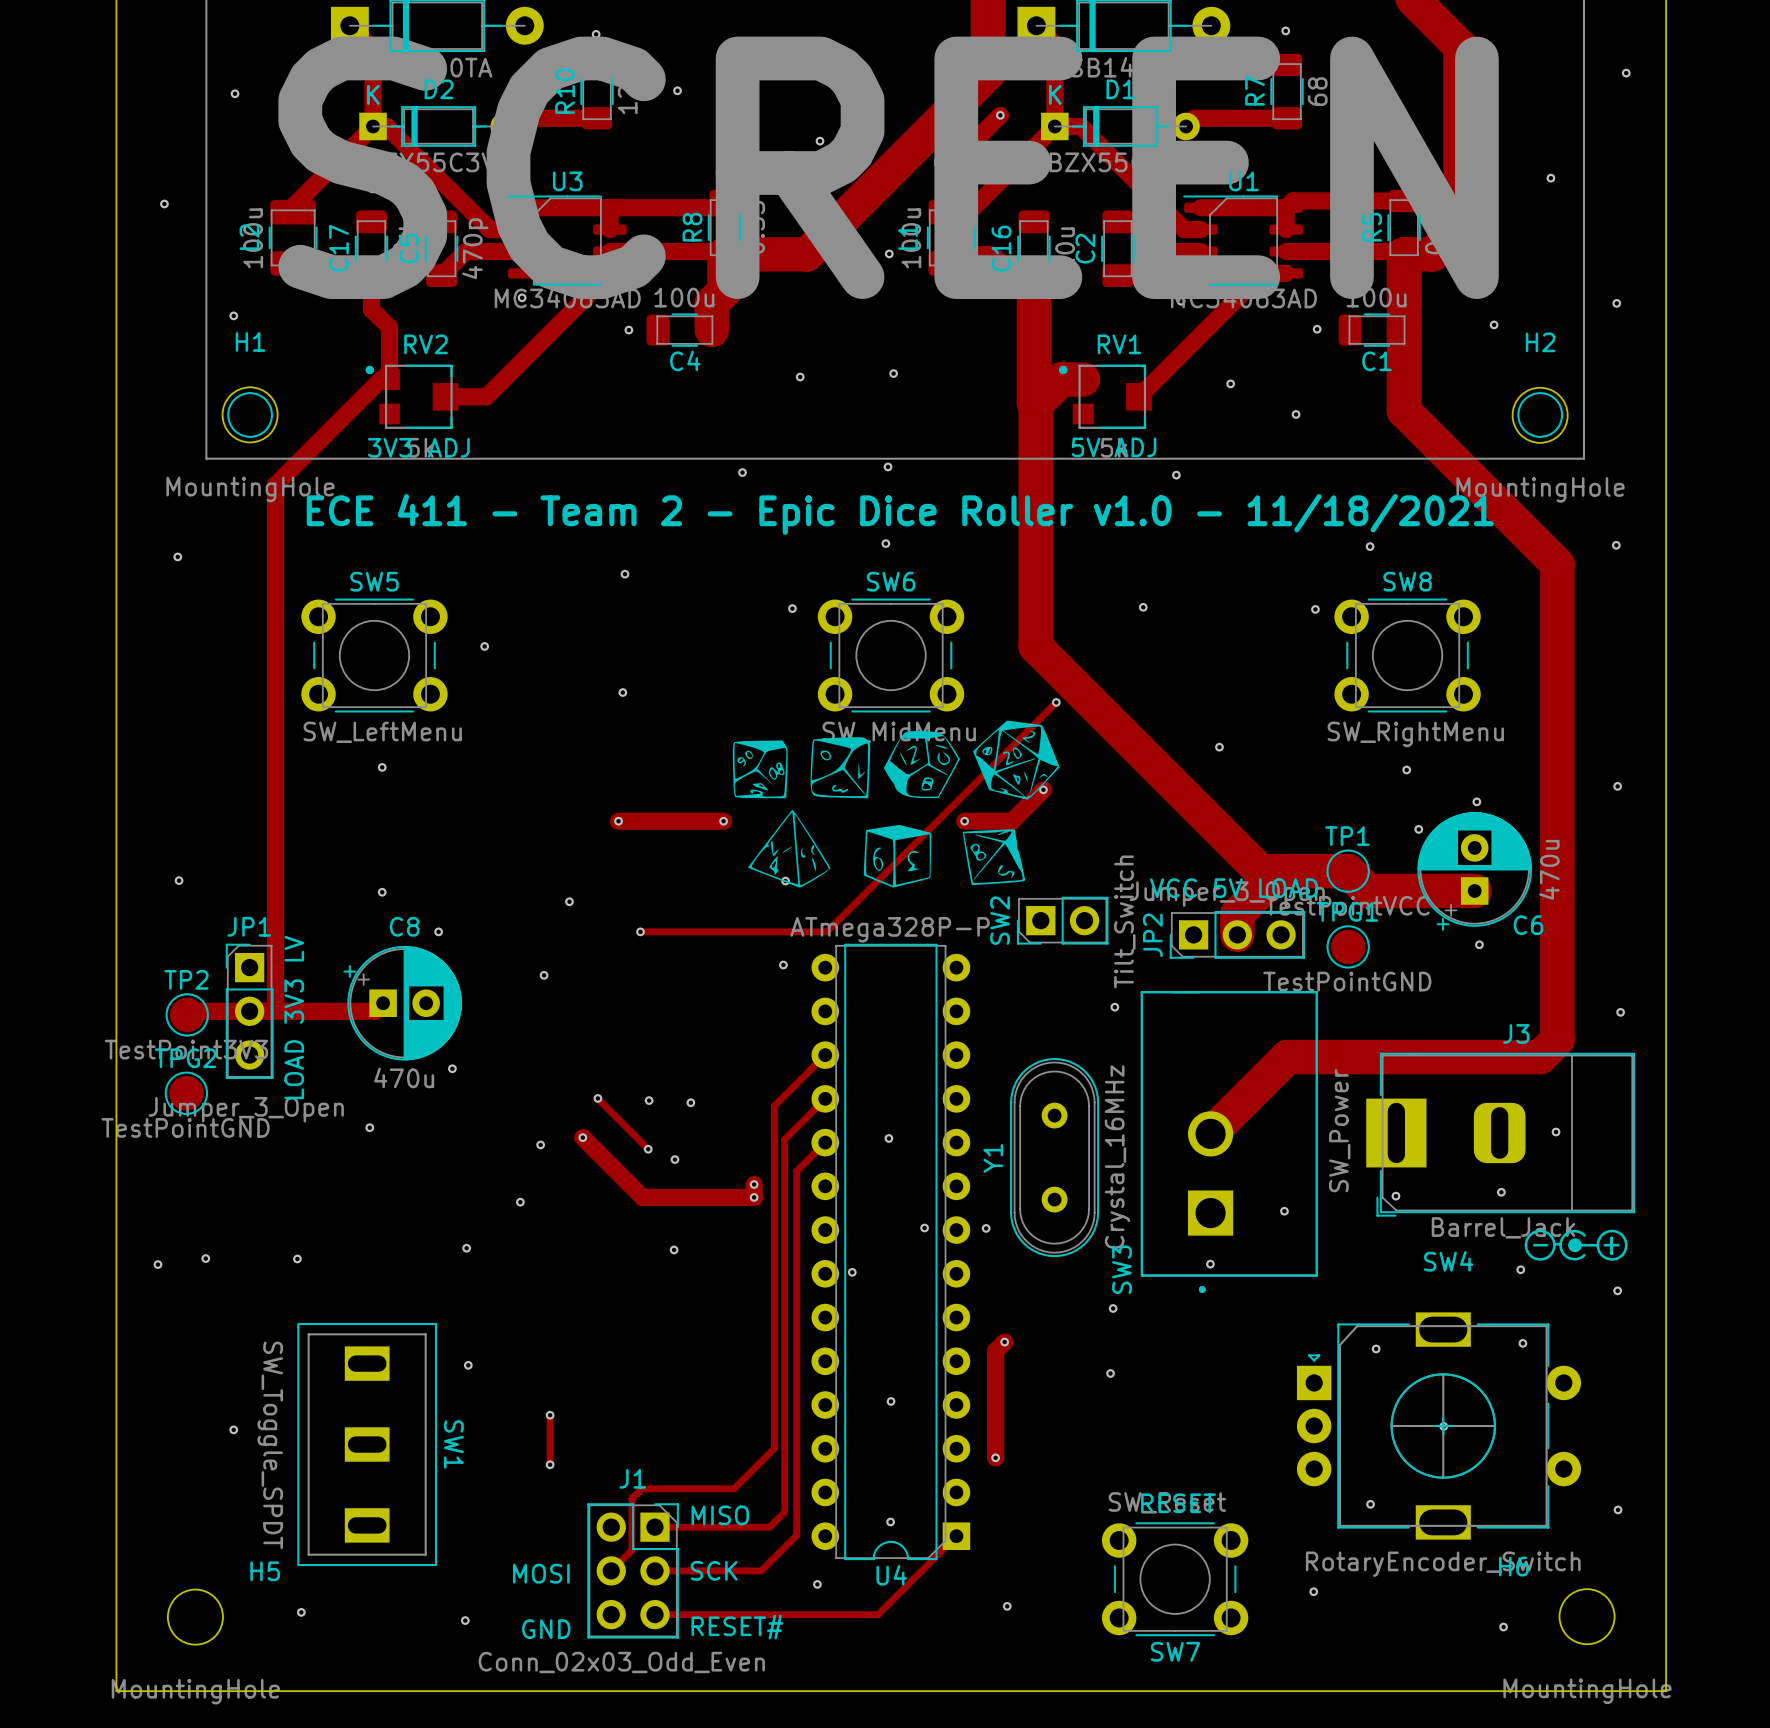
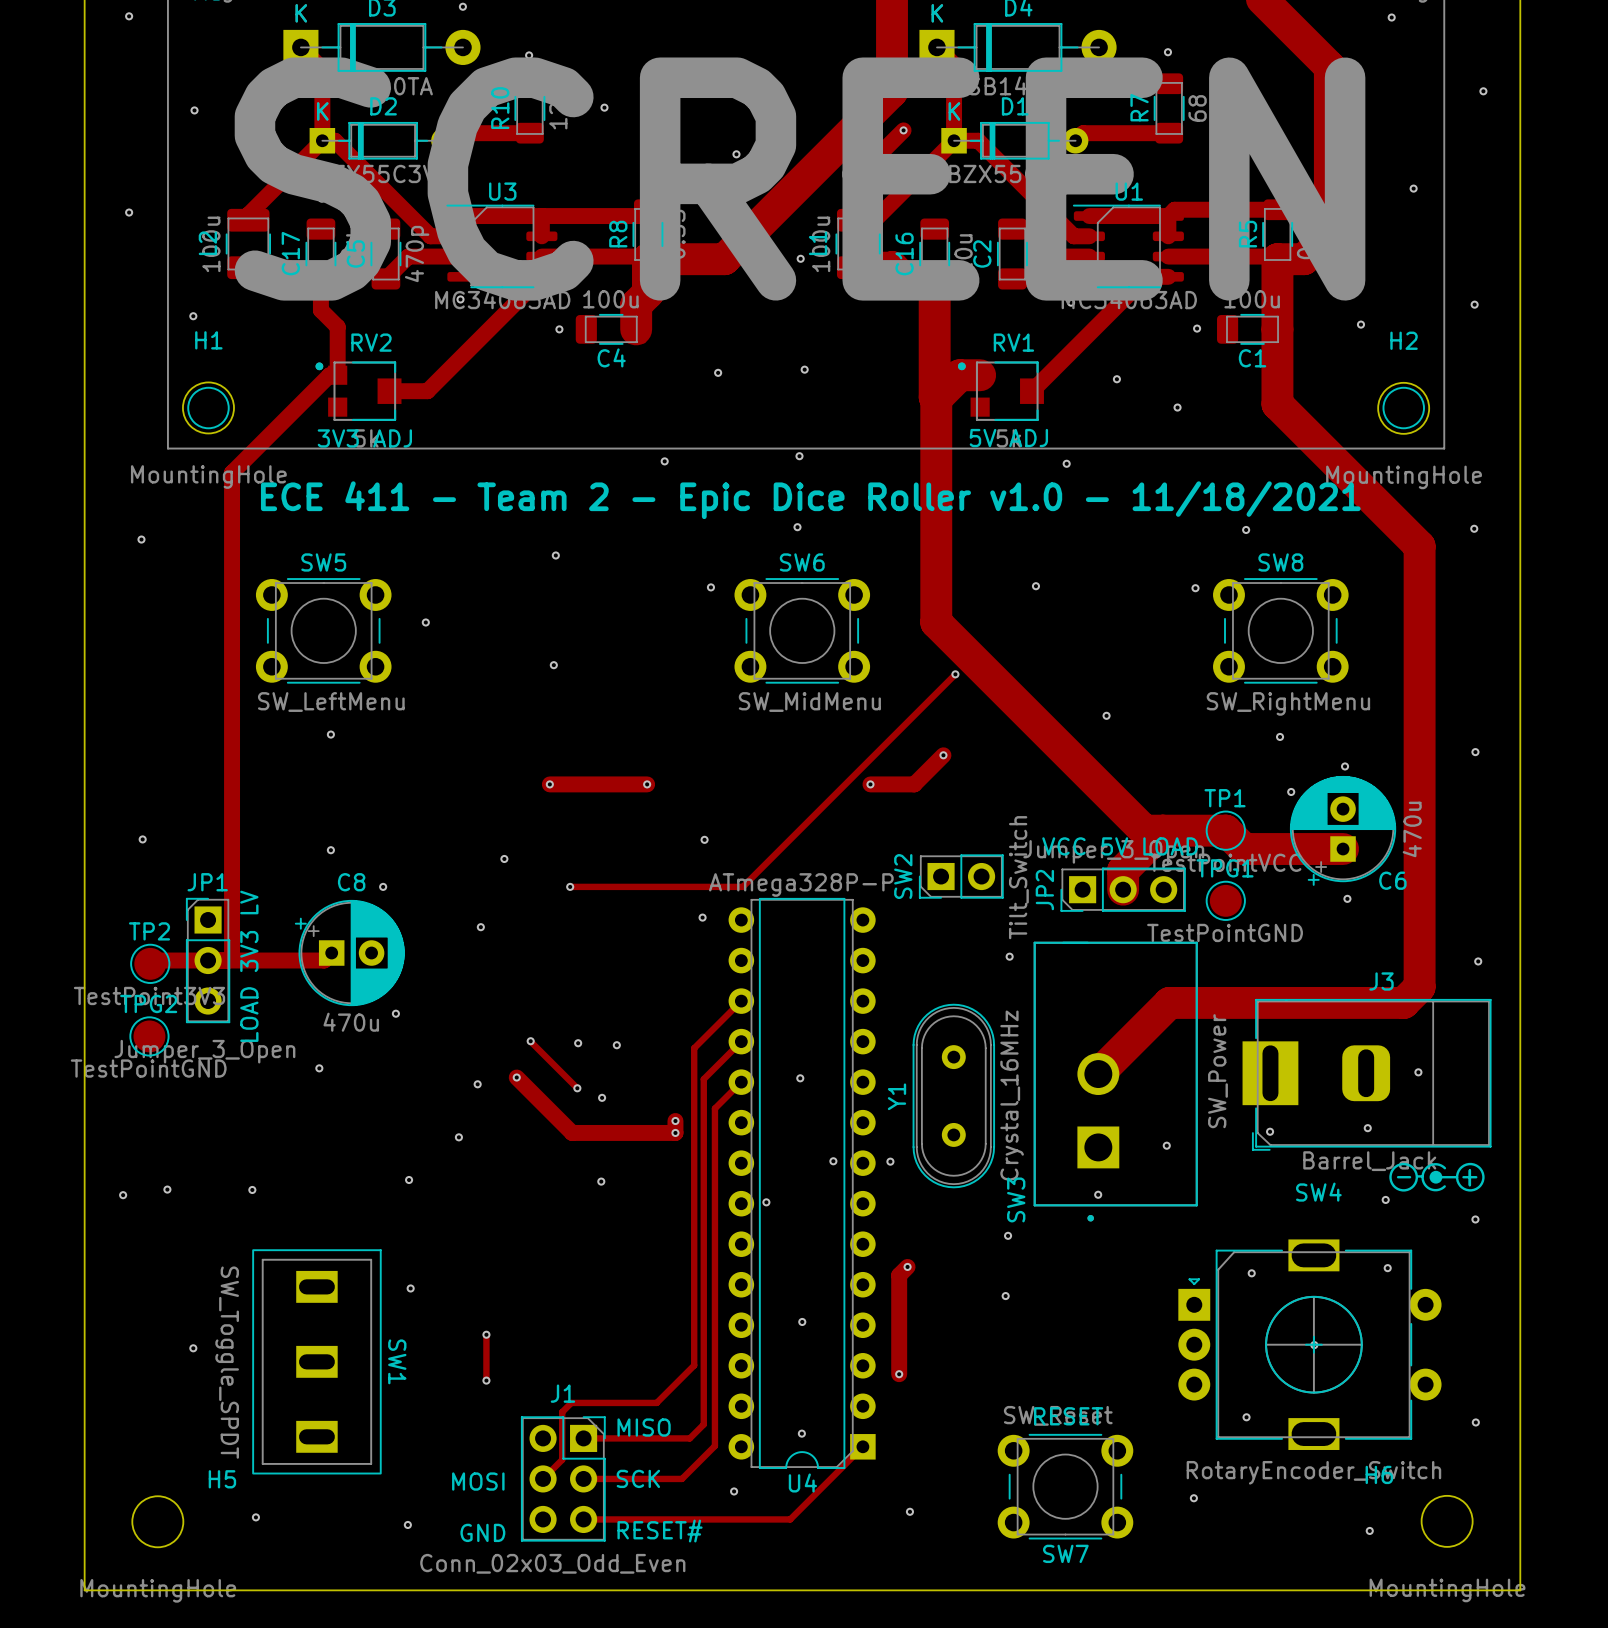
drawing: [732, 720, 1060, 888] -> none

